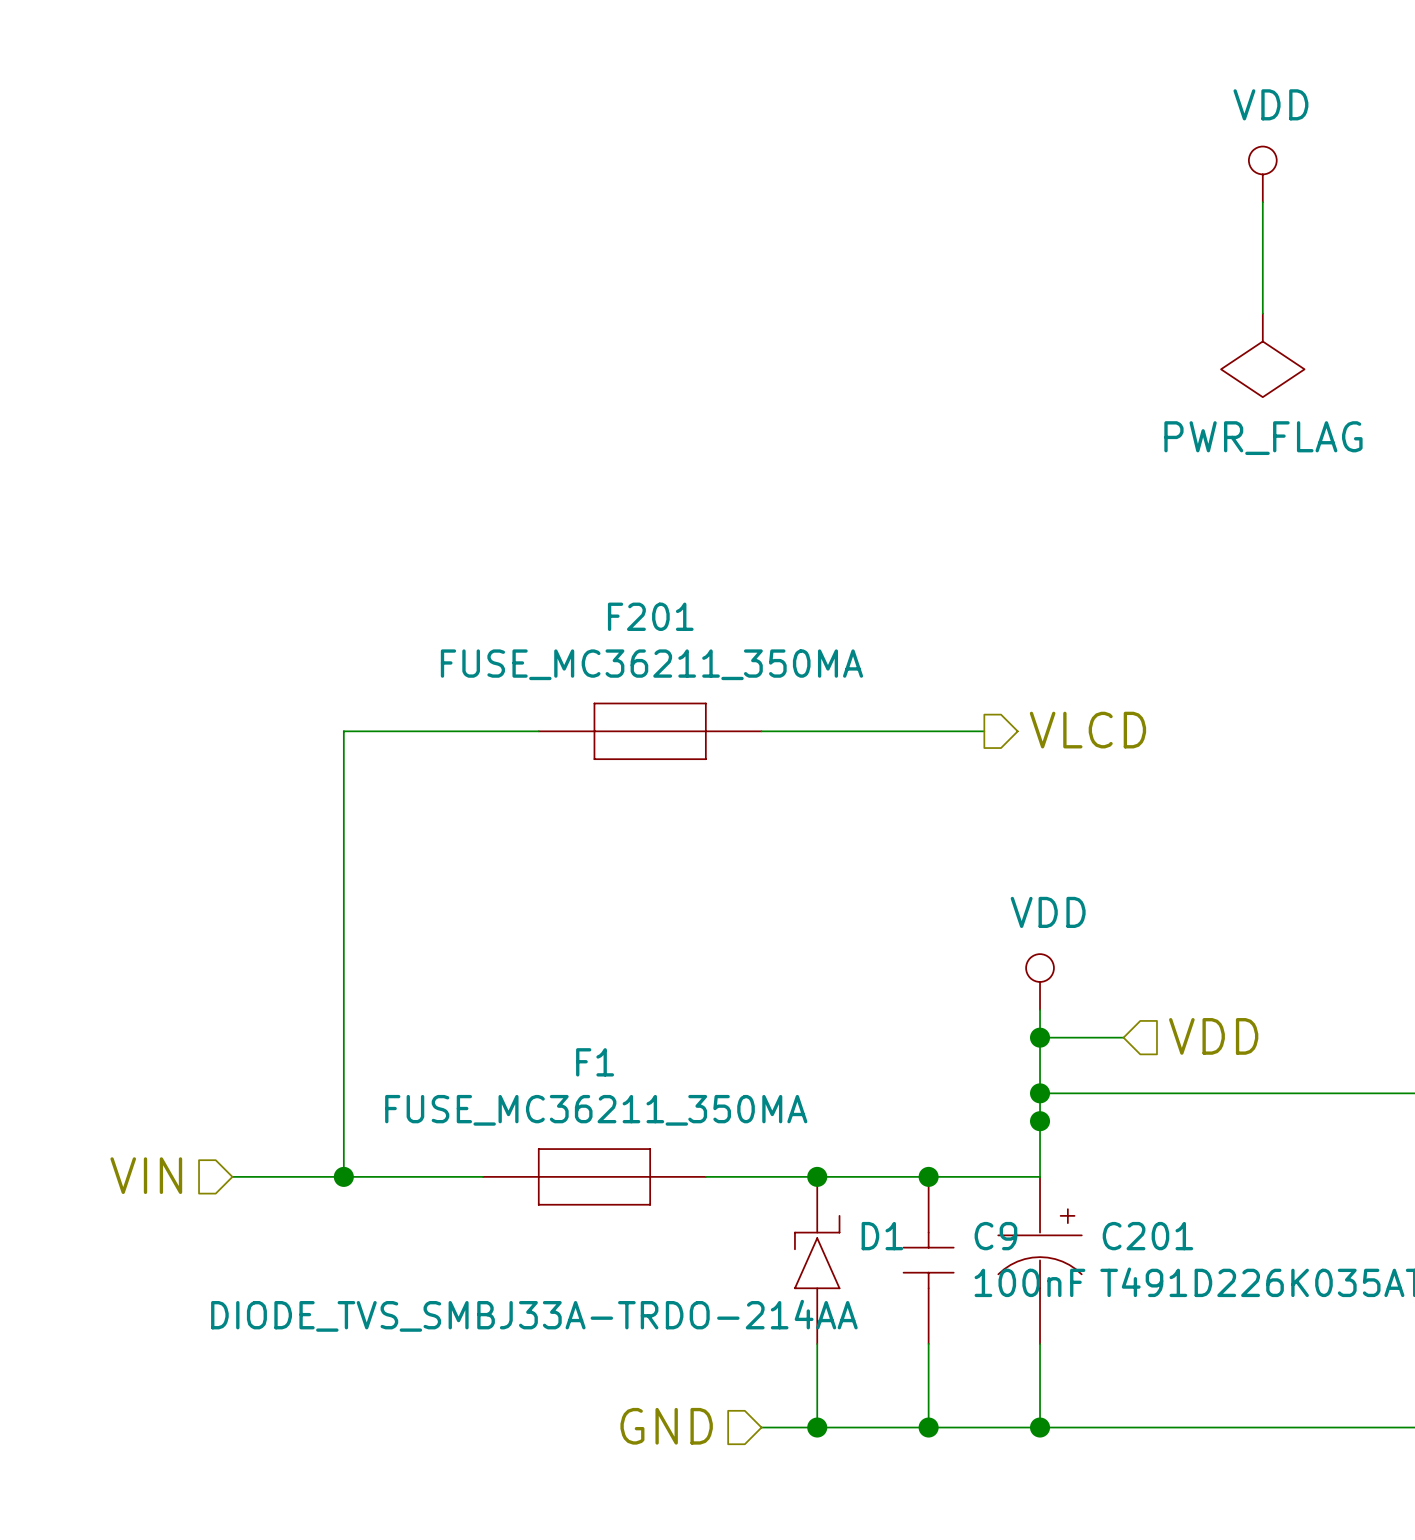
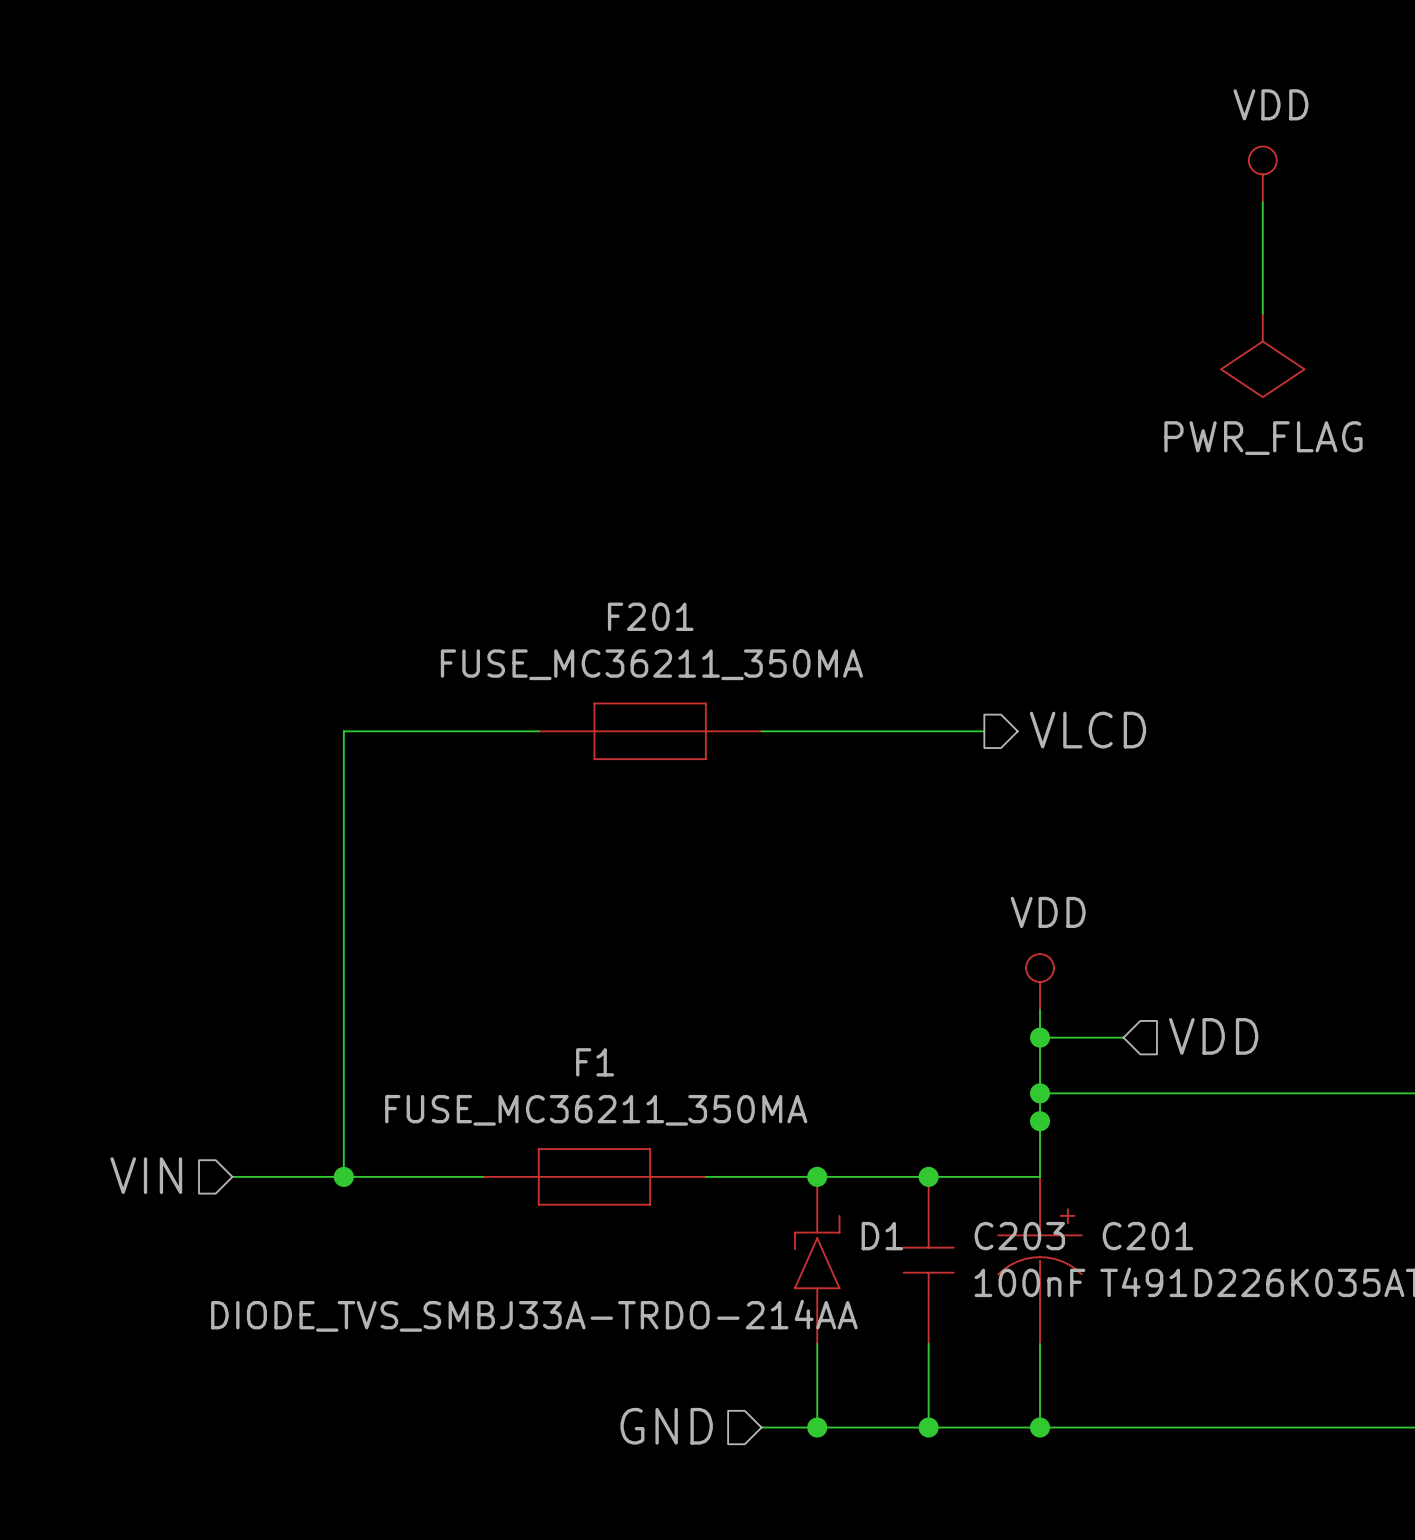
C9 name: C9 (995, 1236) -> C203 (1019, 1236)

